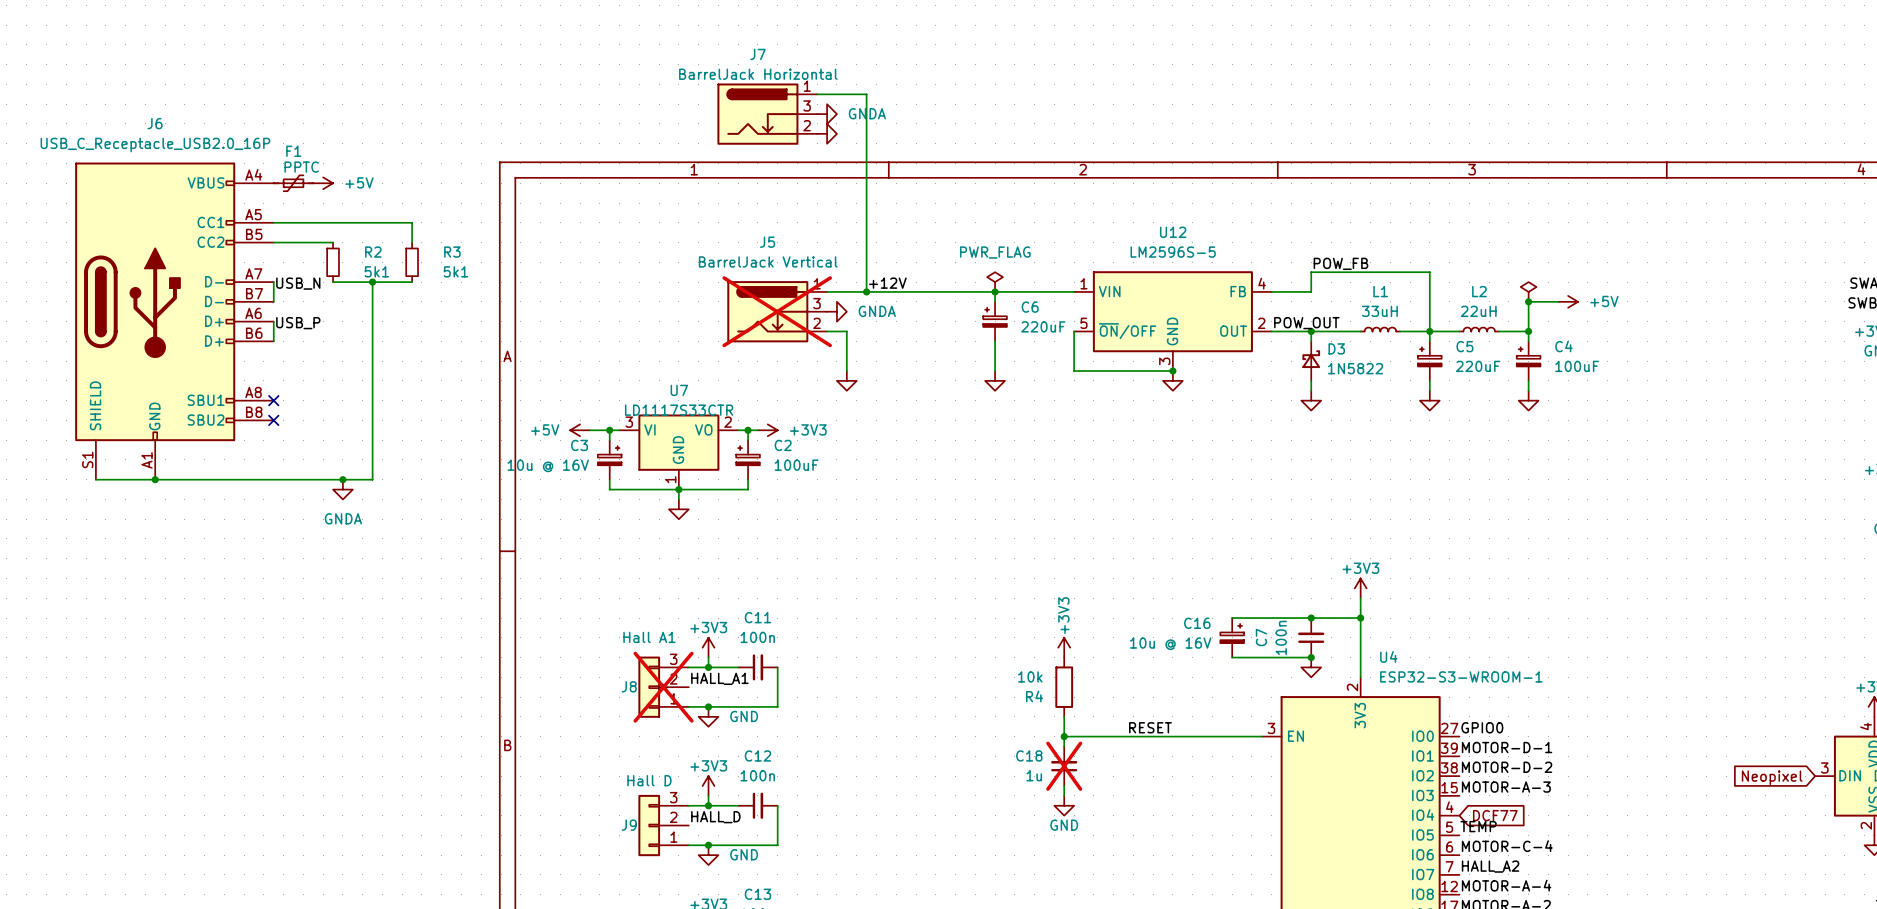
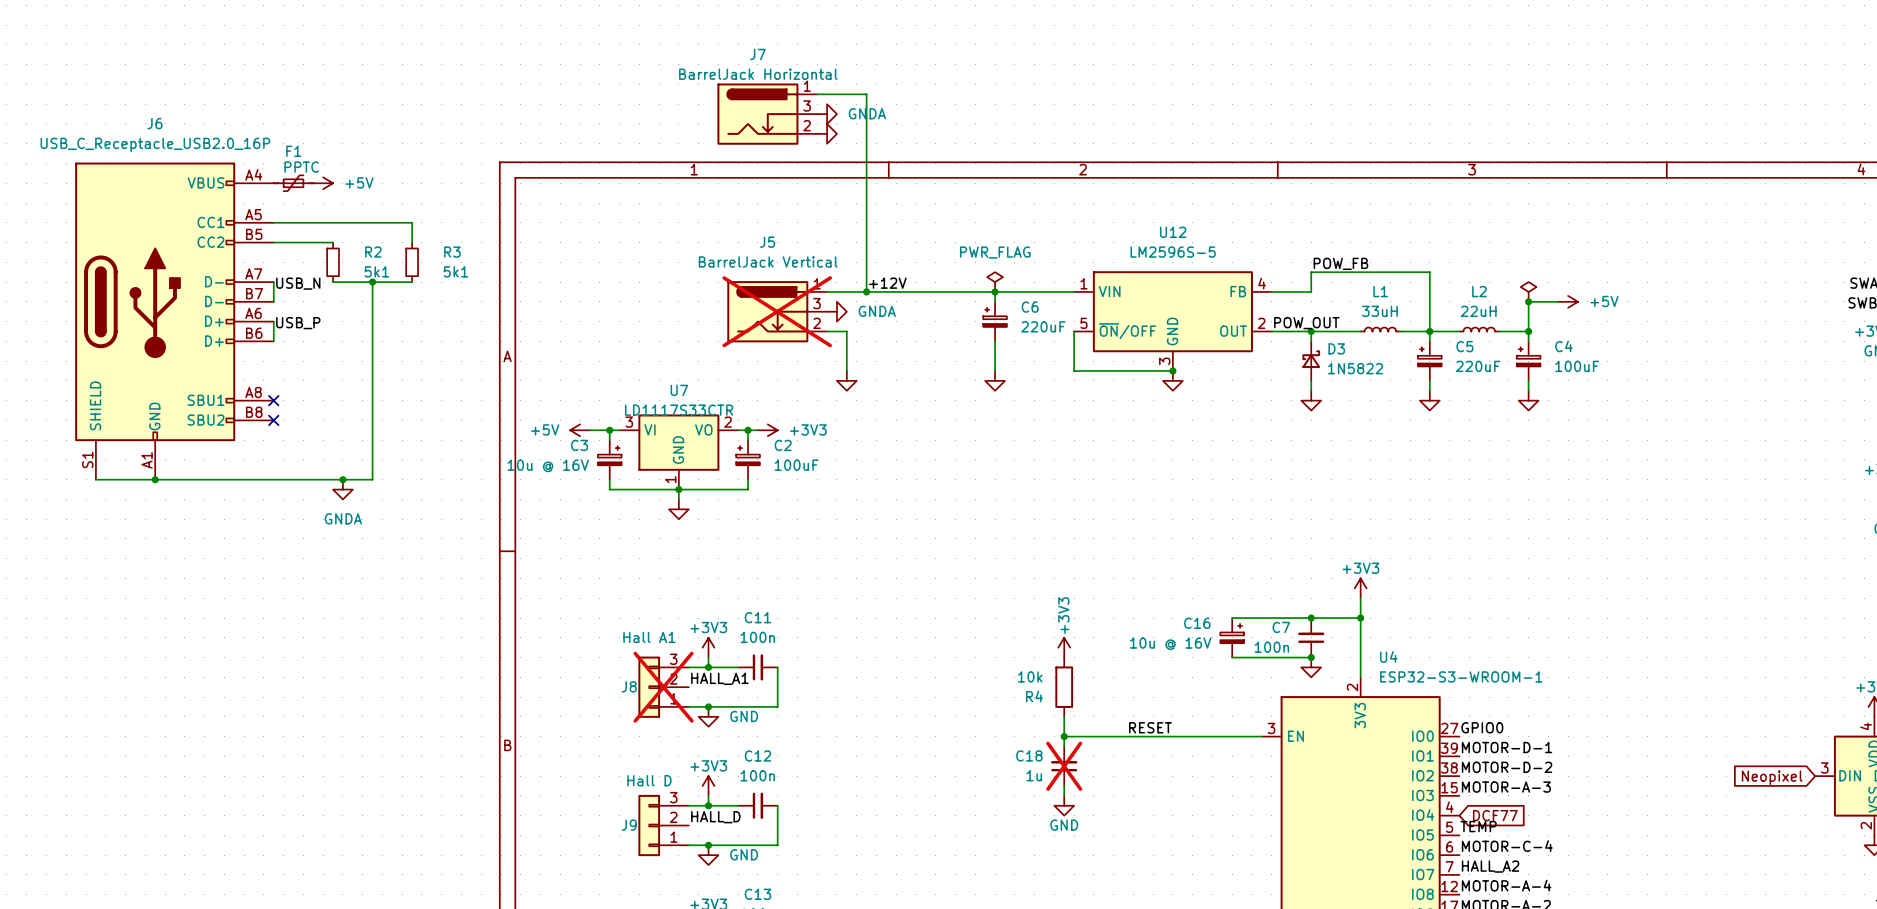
C7 name rotation: 0° (1261, 637) -> 90° clockwise (1281, 627)
C7 value rotation: 0° (1281, 637) -> 90° clockwise (1271, 647)

